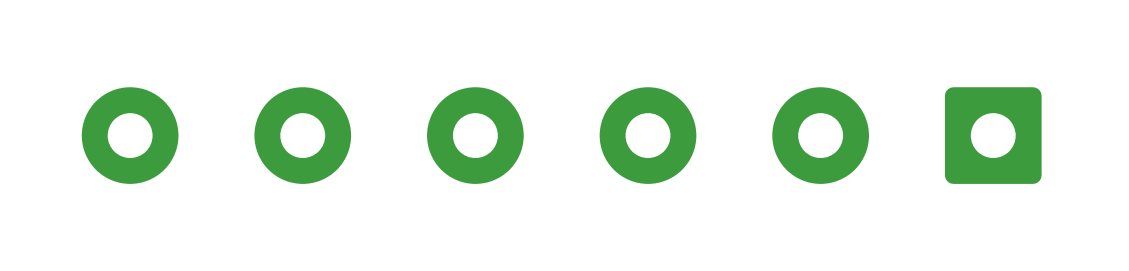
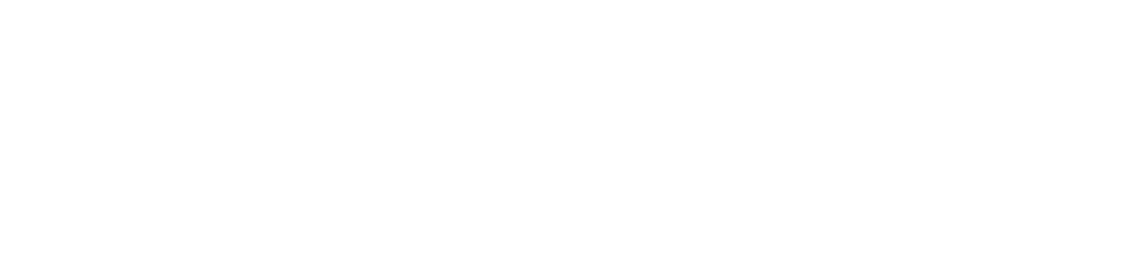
part: (561, 135) -> none

